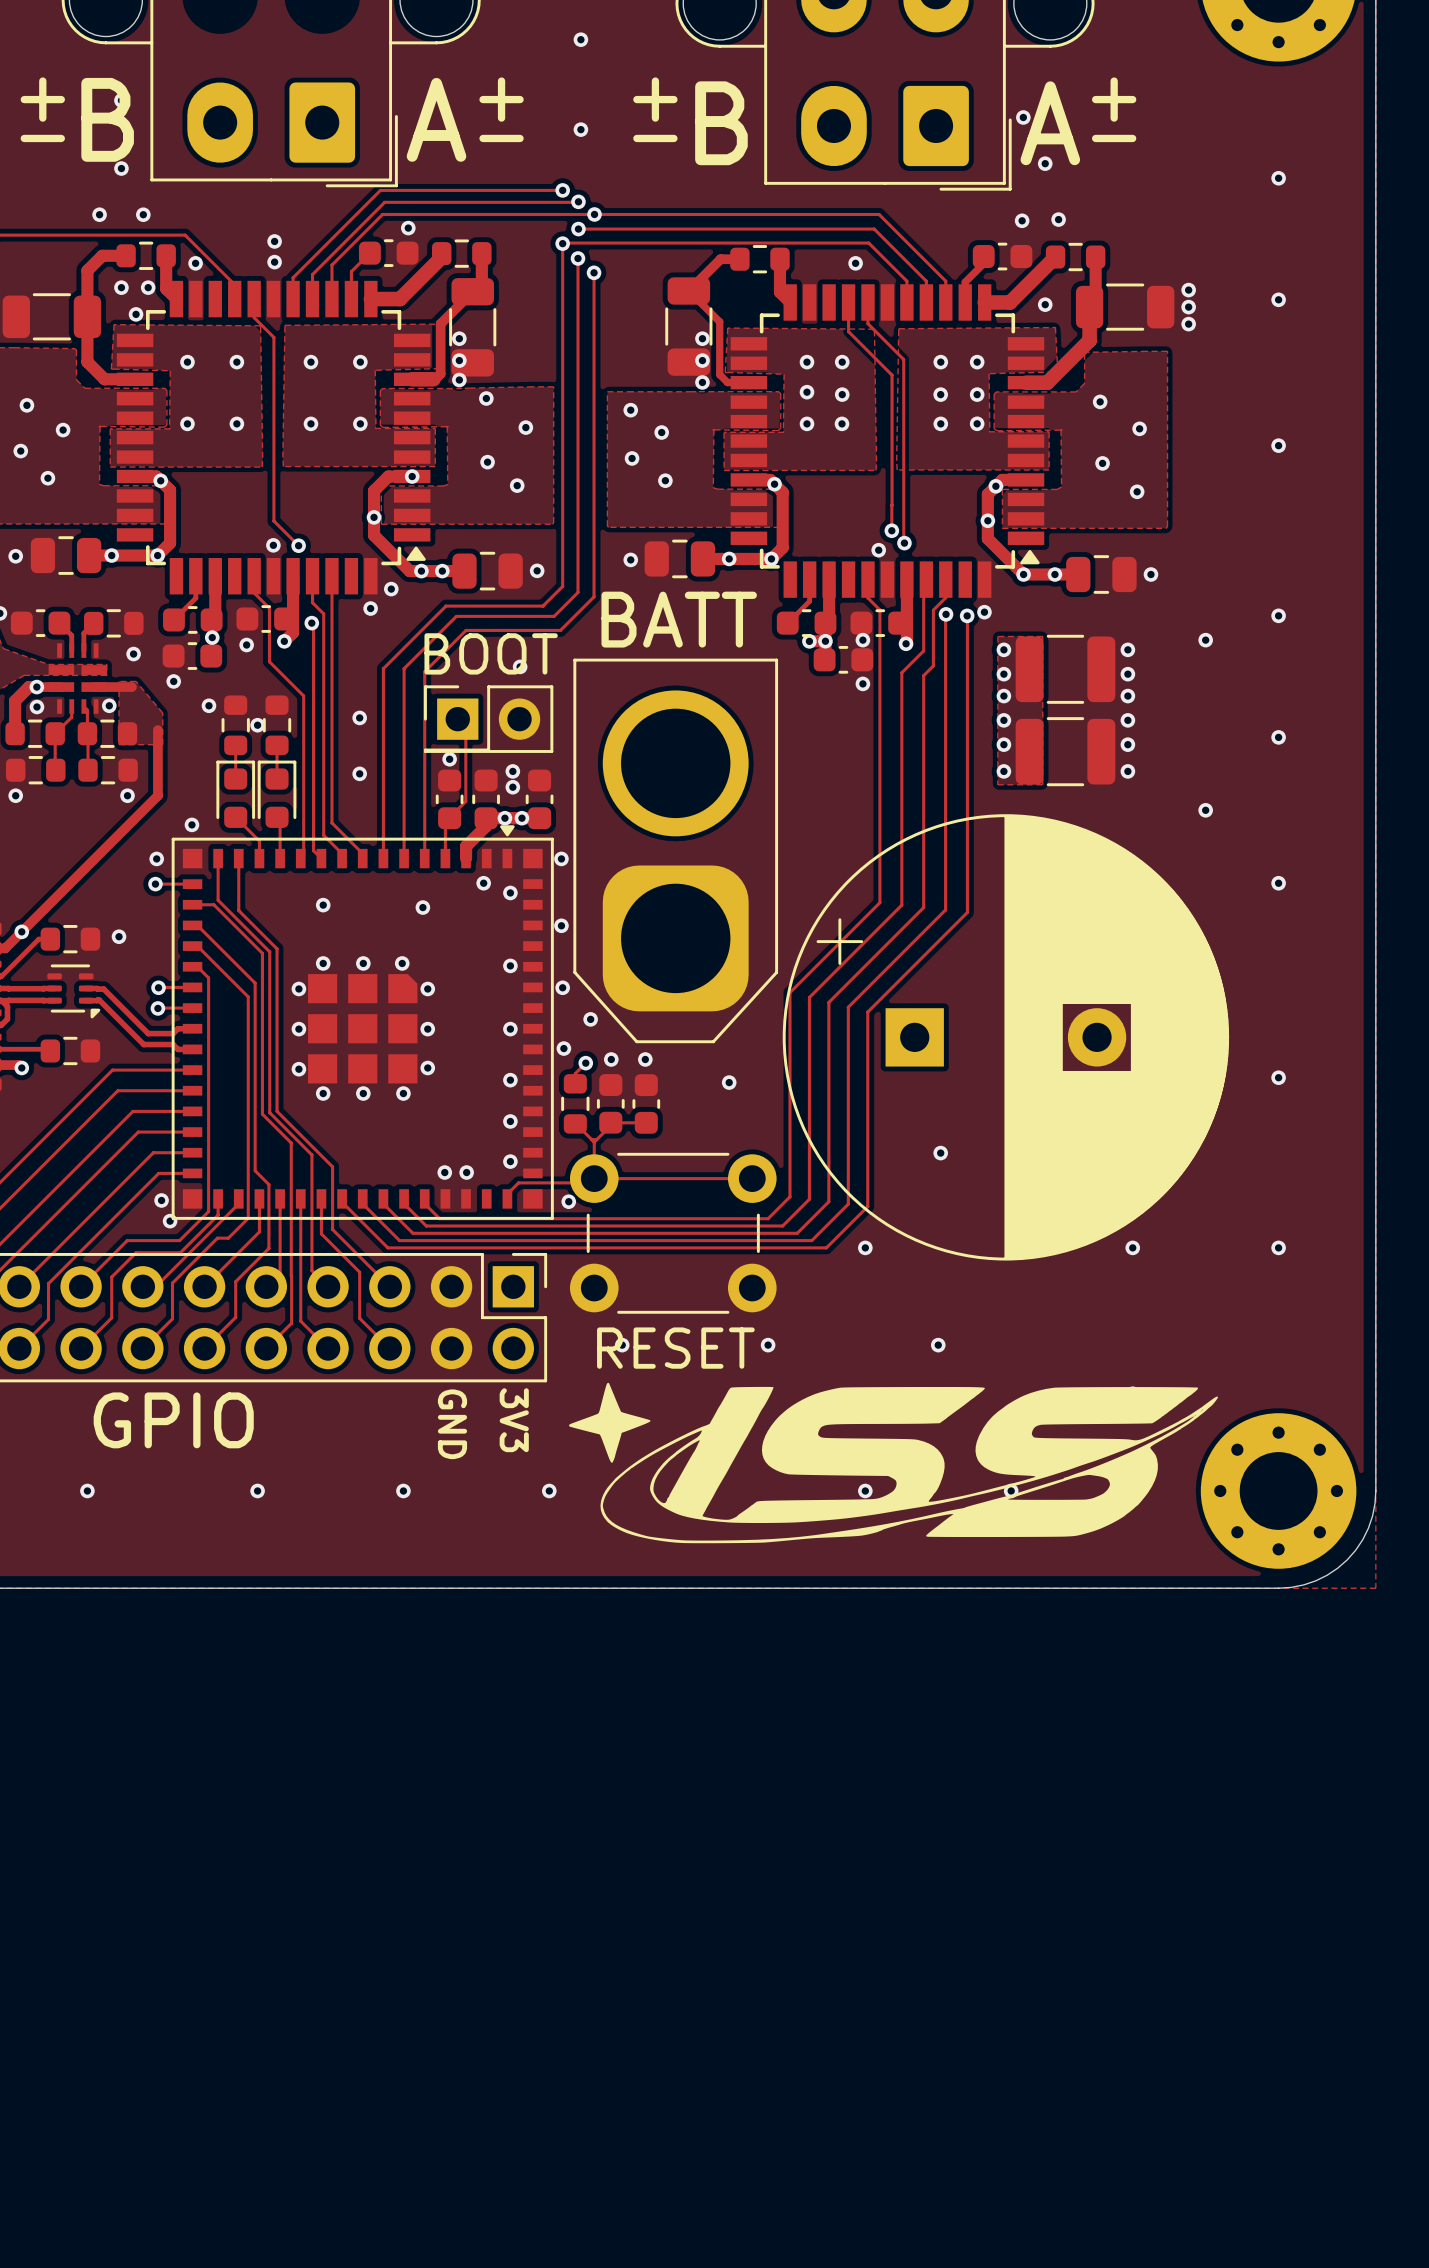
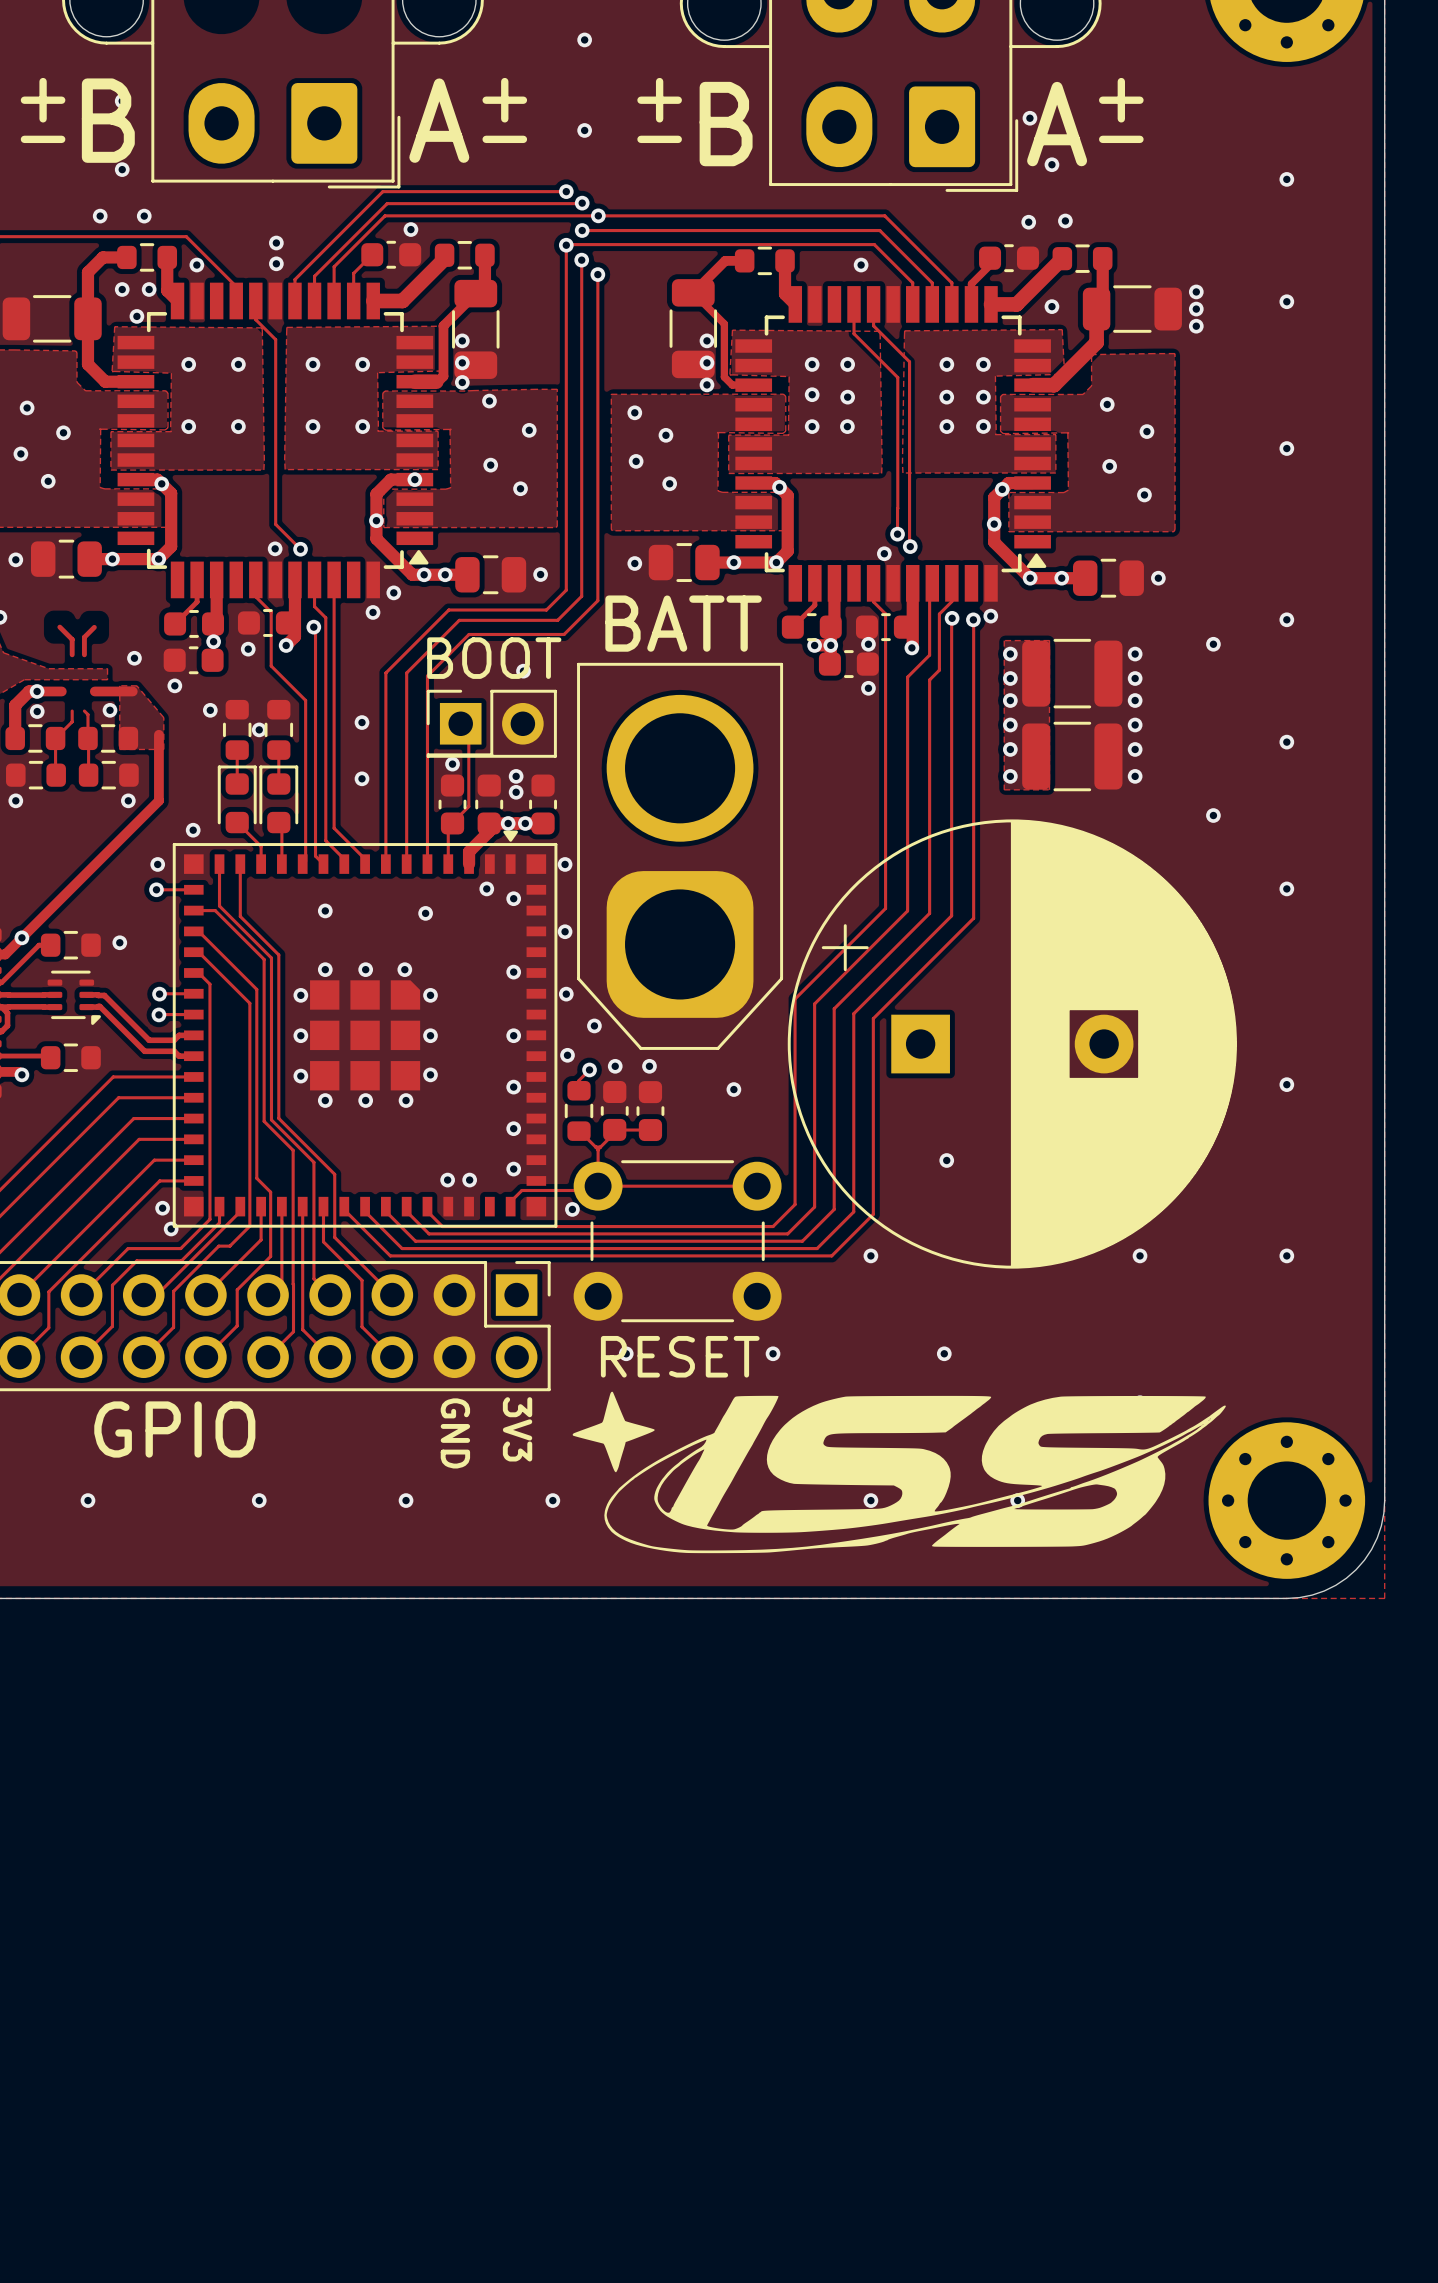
part: (40, 623) -> none
part: (113, 623) -> none
part: (77, 678) -> none

